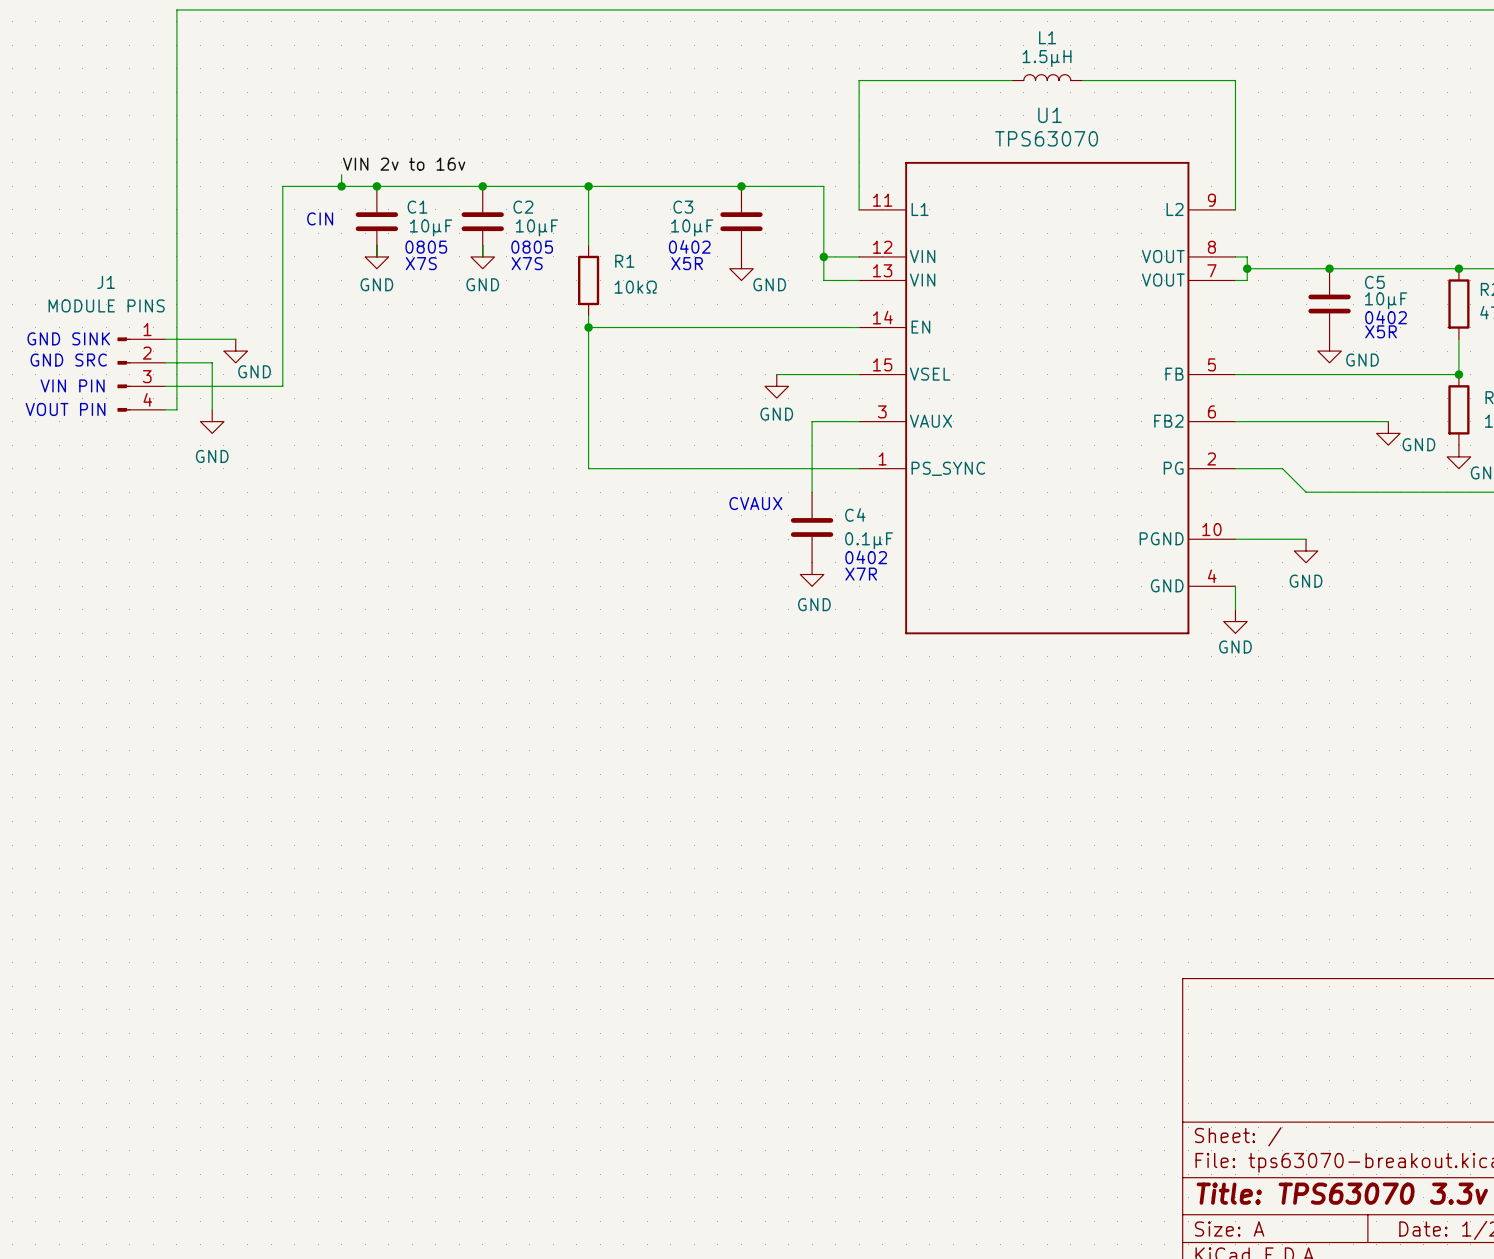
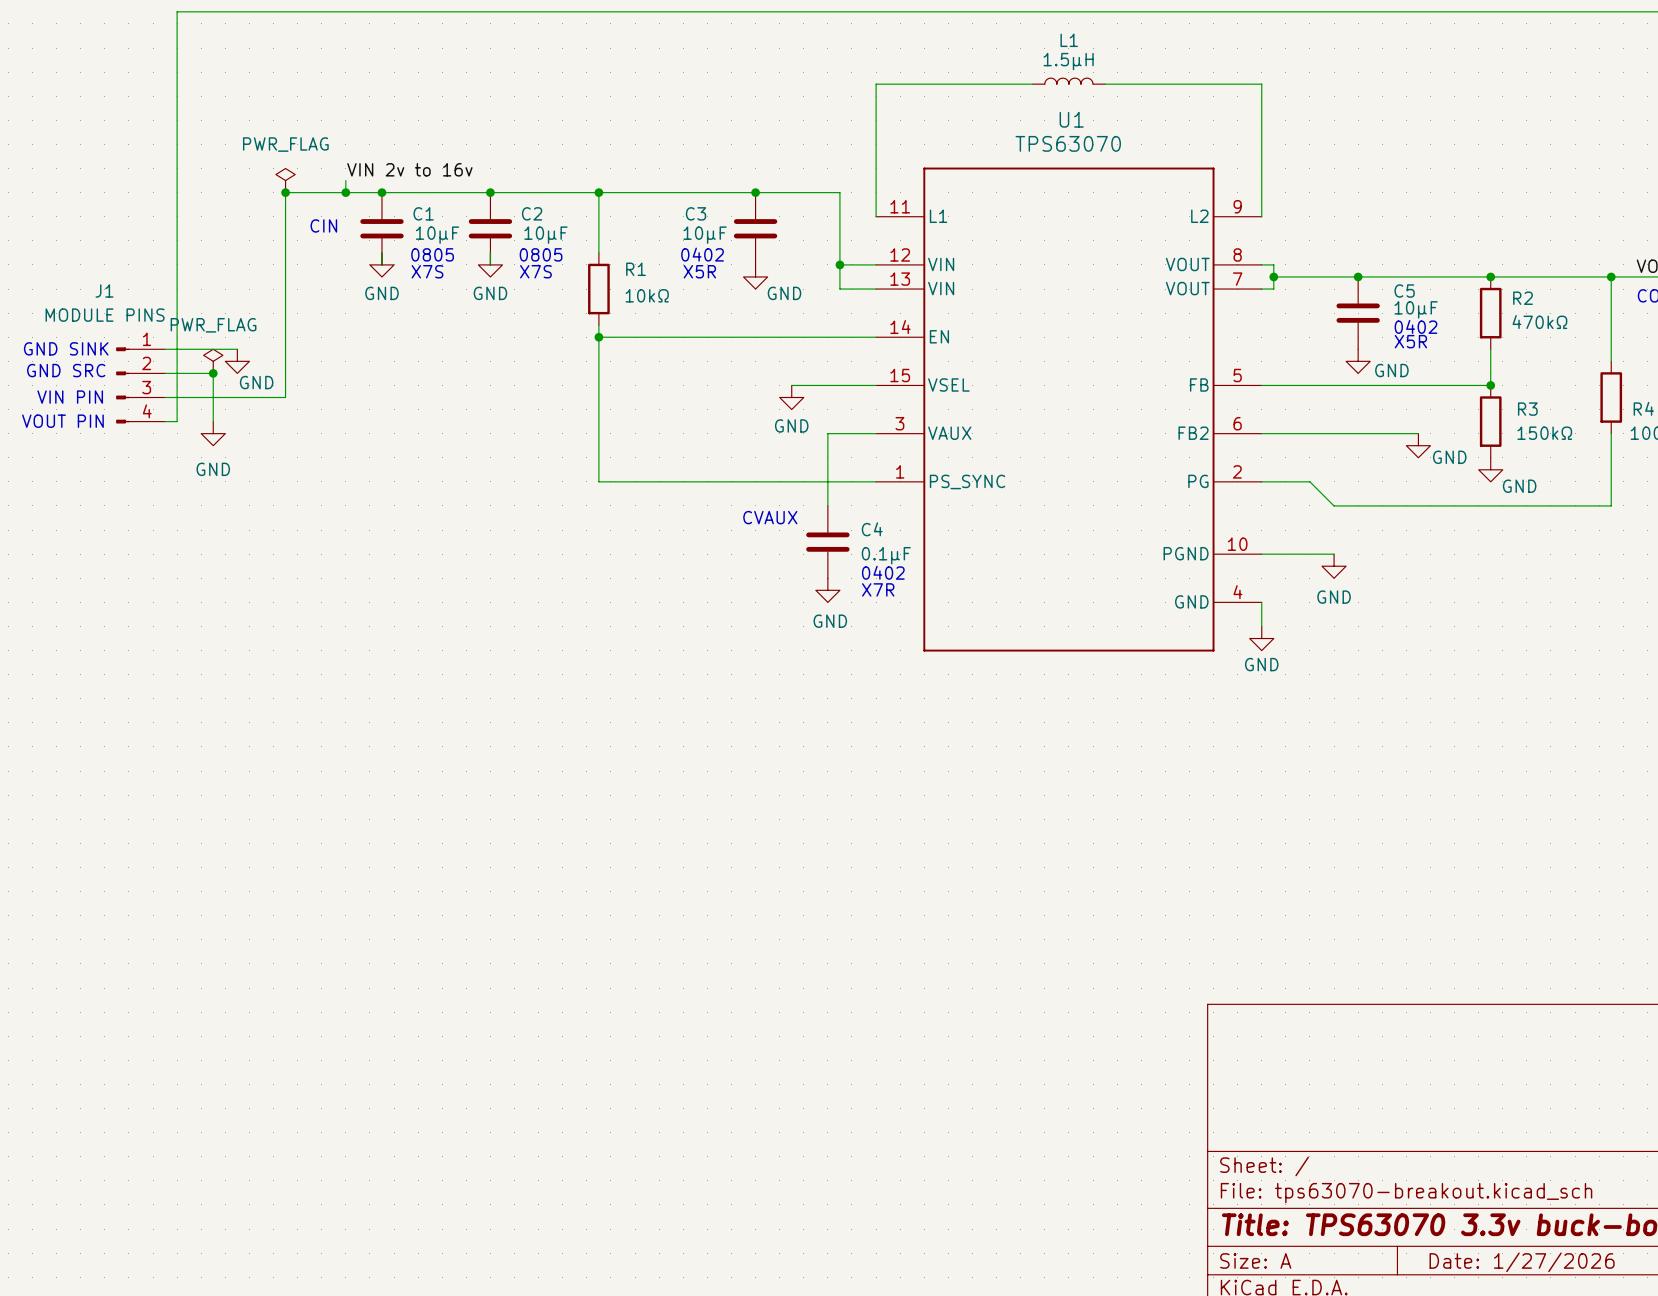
power symbol: none -> PWR_FLAG (285, 180)
junction: none -> (285, 192)
power symbol: none -> PWR_FLAG (213, 361)
junction: none -> (213, 373)

